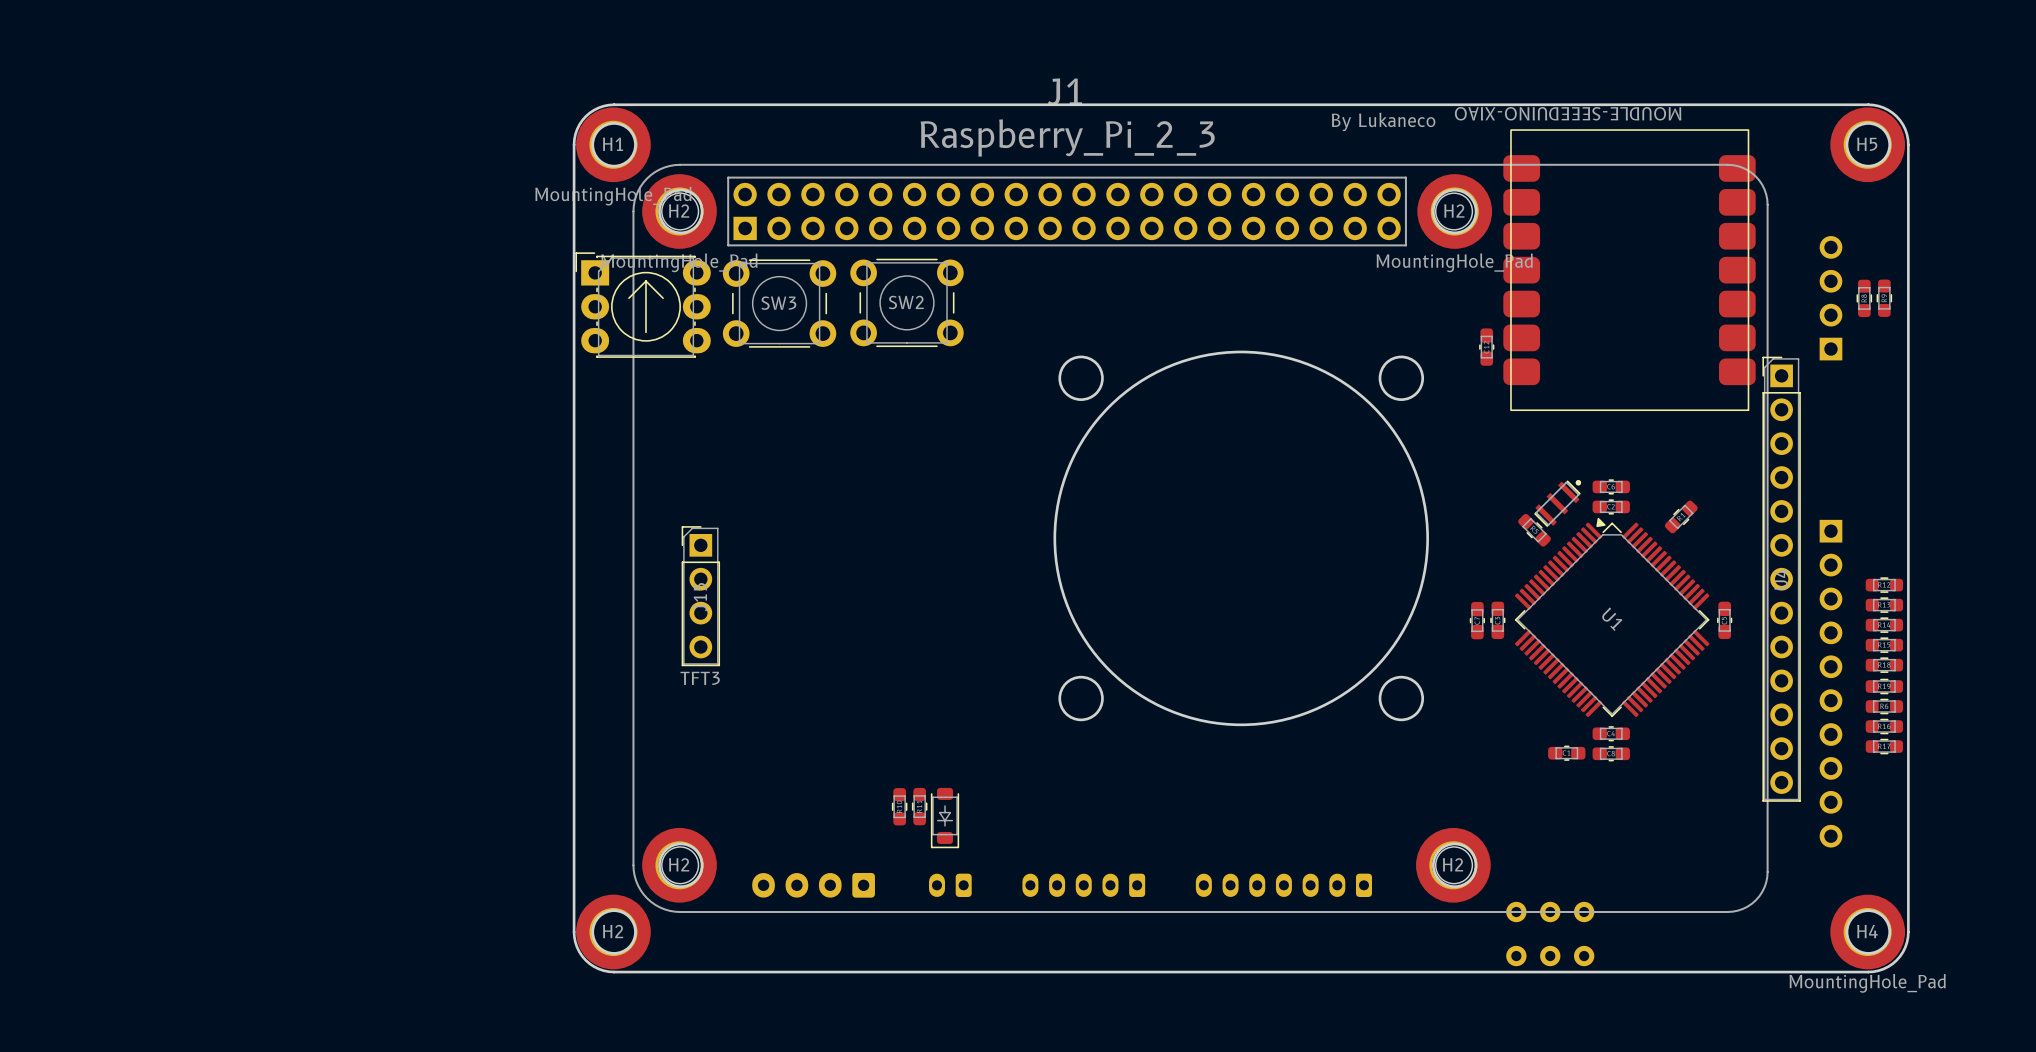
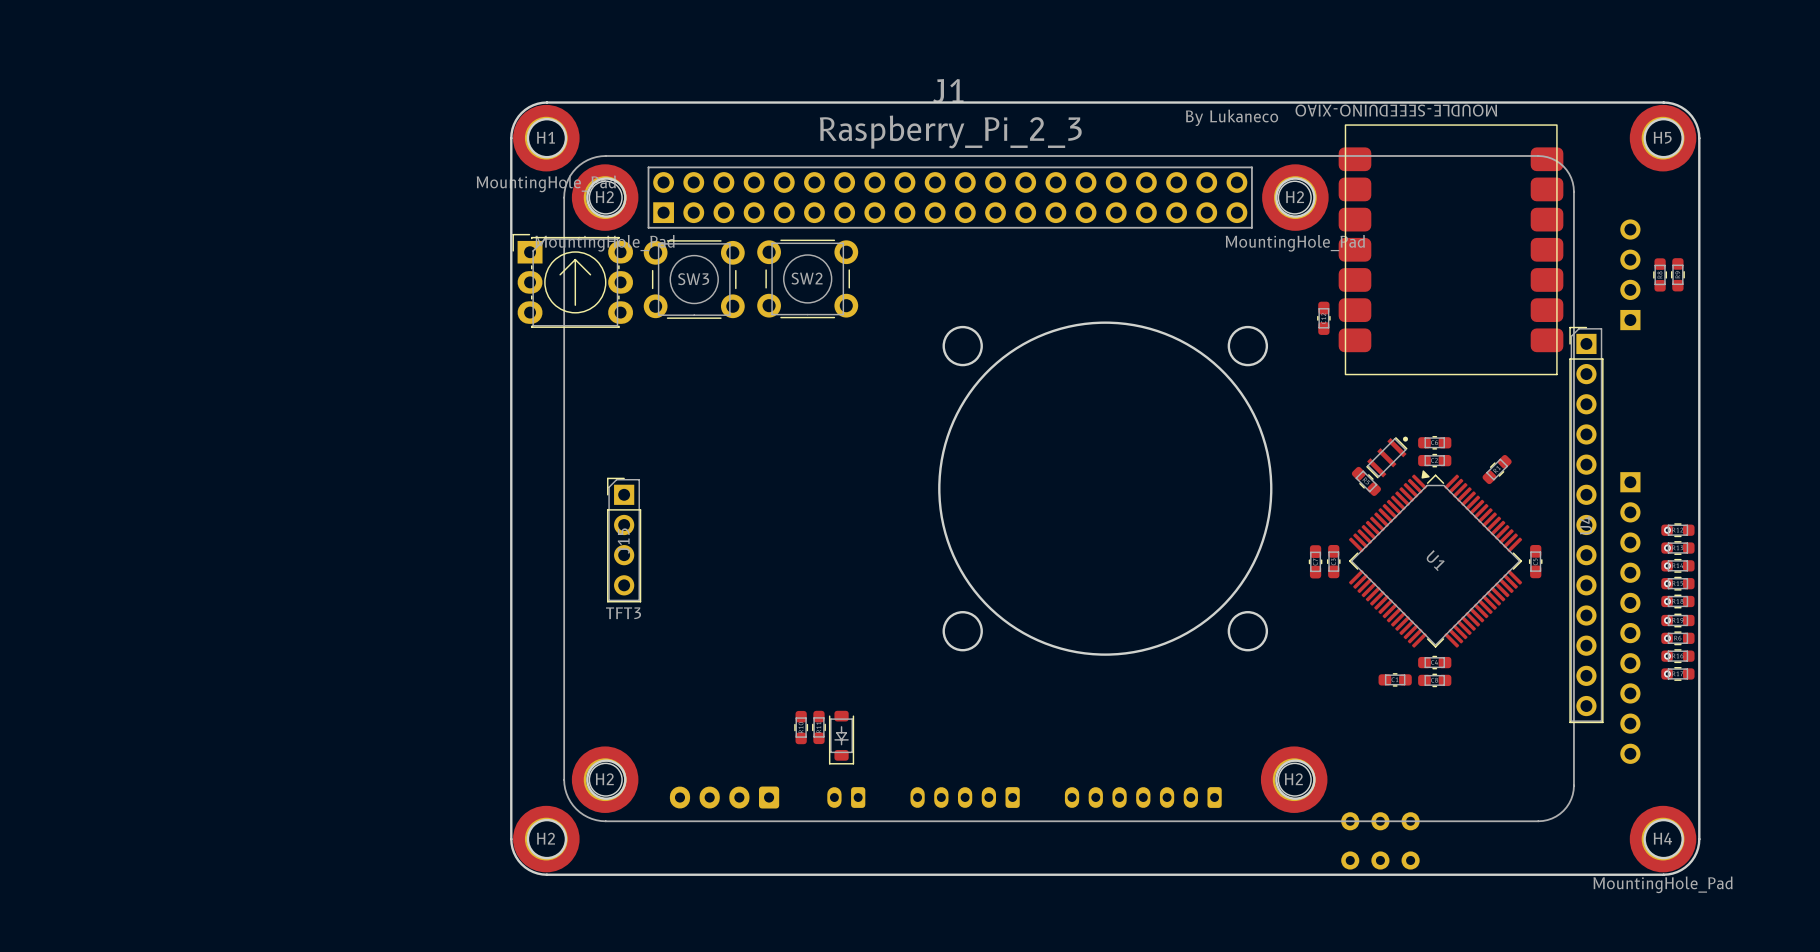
via: none -> (1667, 530)
via: none -> (1667, 548)
via: none -> (1667, 565)
via: none -> (1667, 583)
via: none -> (1667, 601)
via: none -> (1667, 620)
via: none -> (1667, 638)
via: none -> (1667, 656)
via: none -> (1667, 673)

